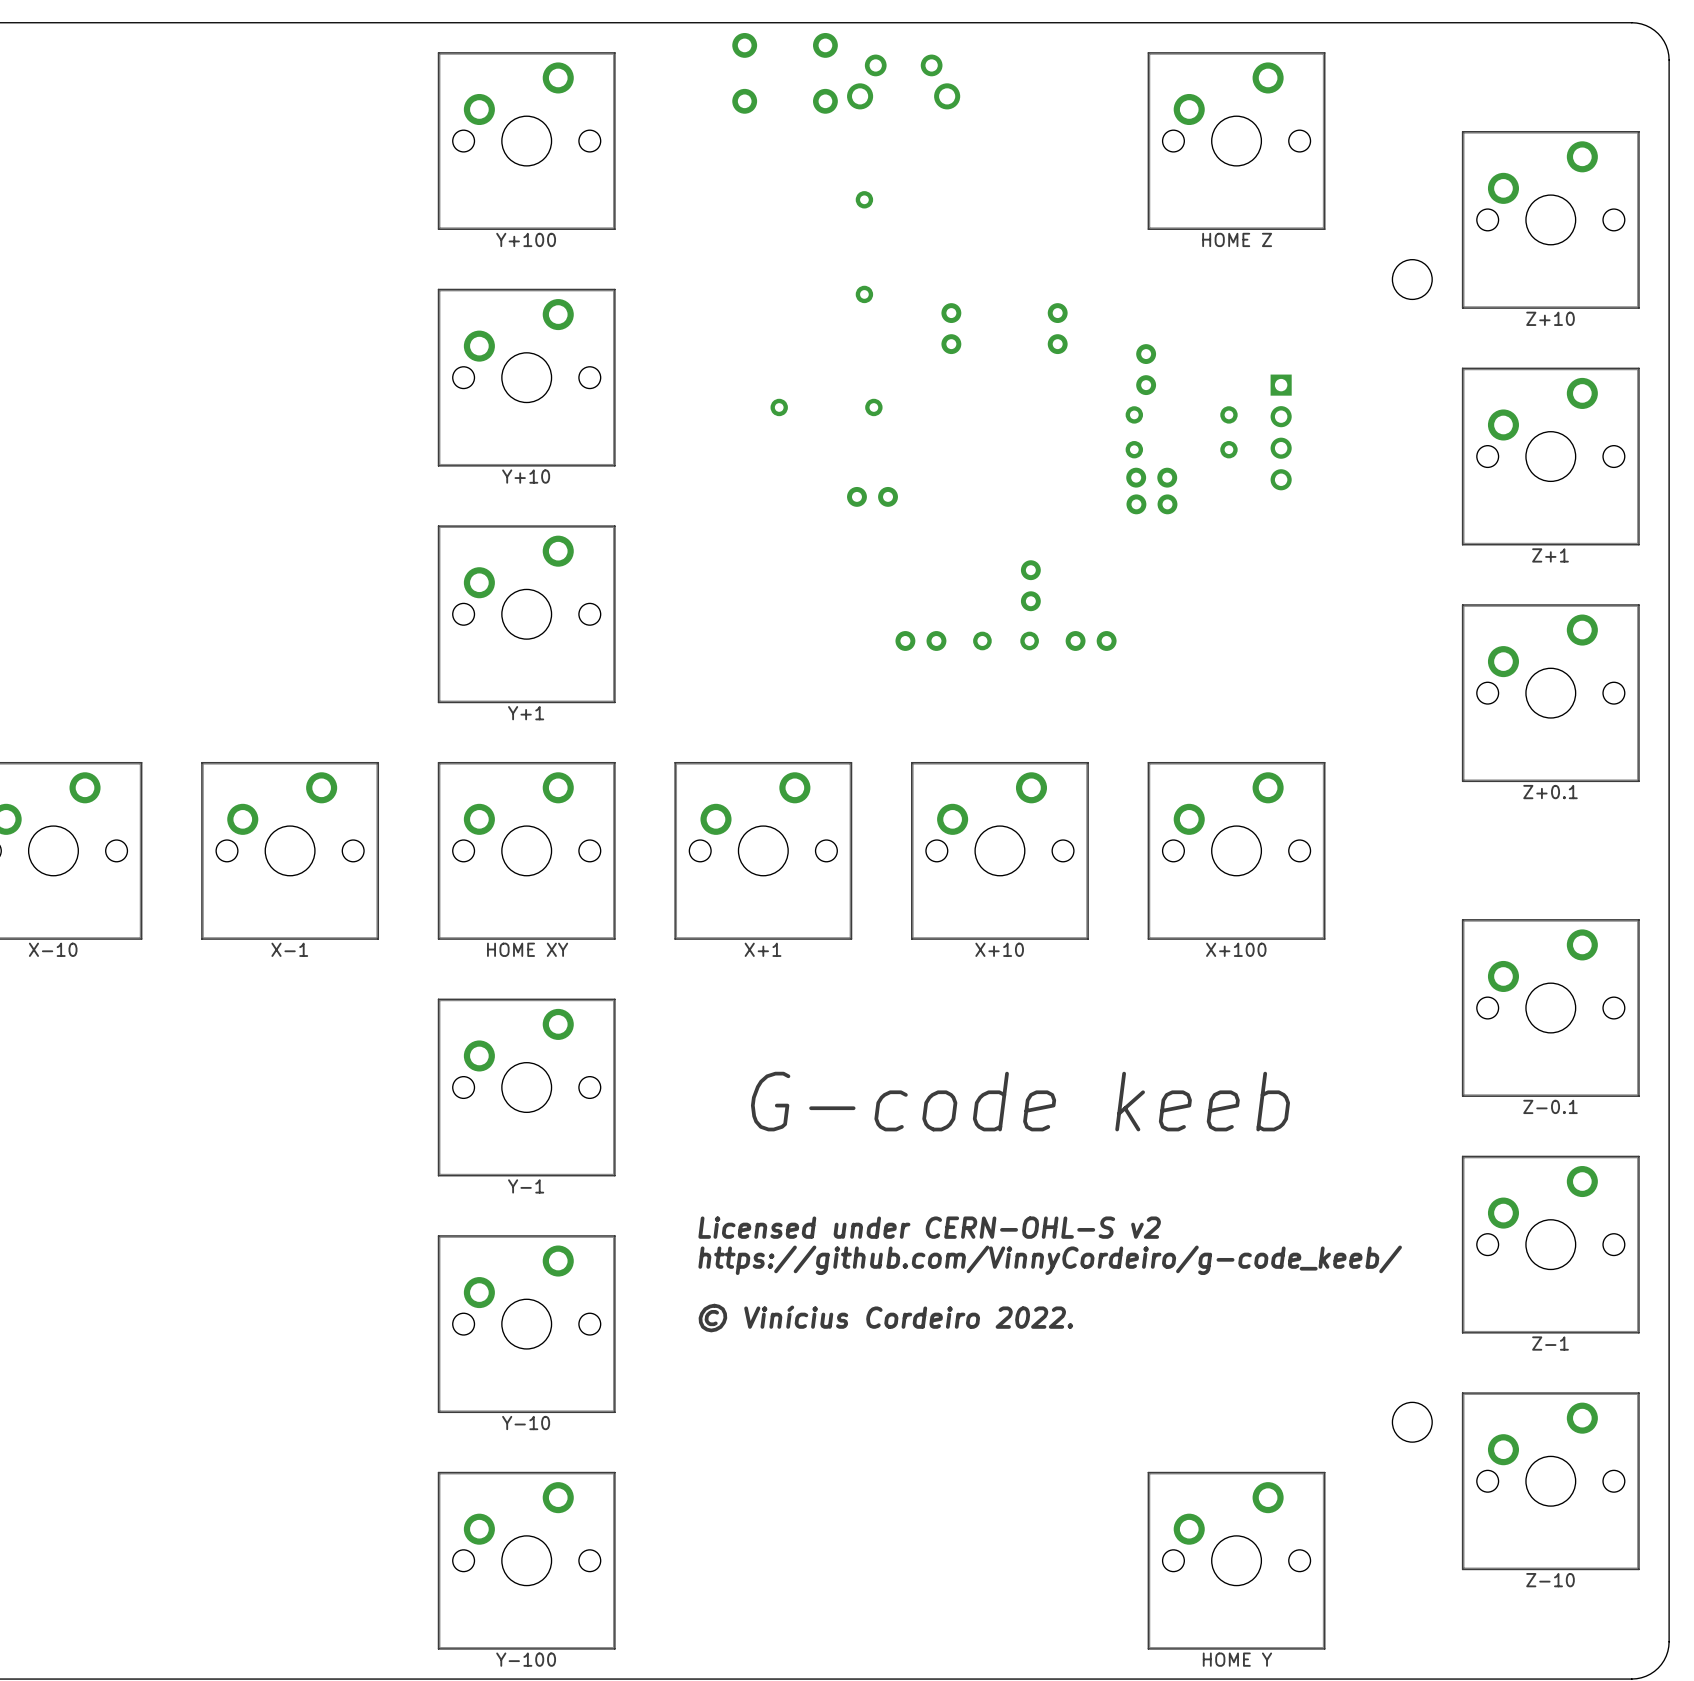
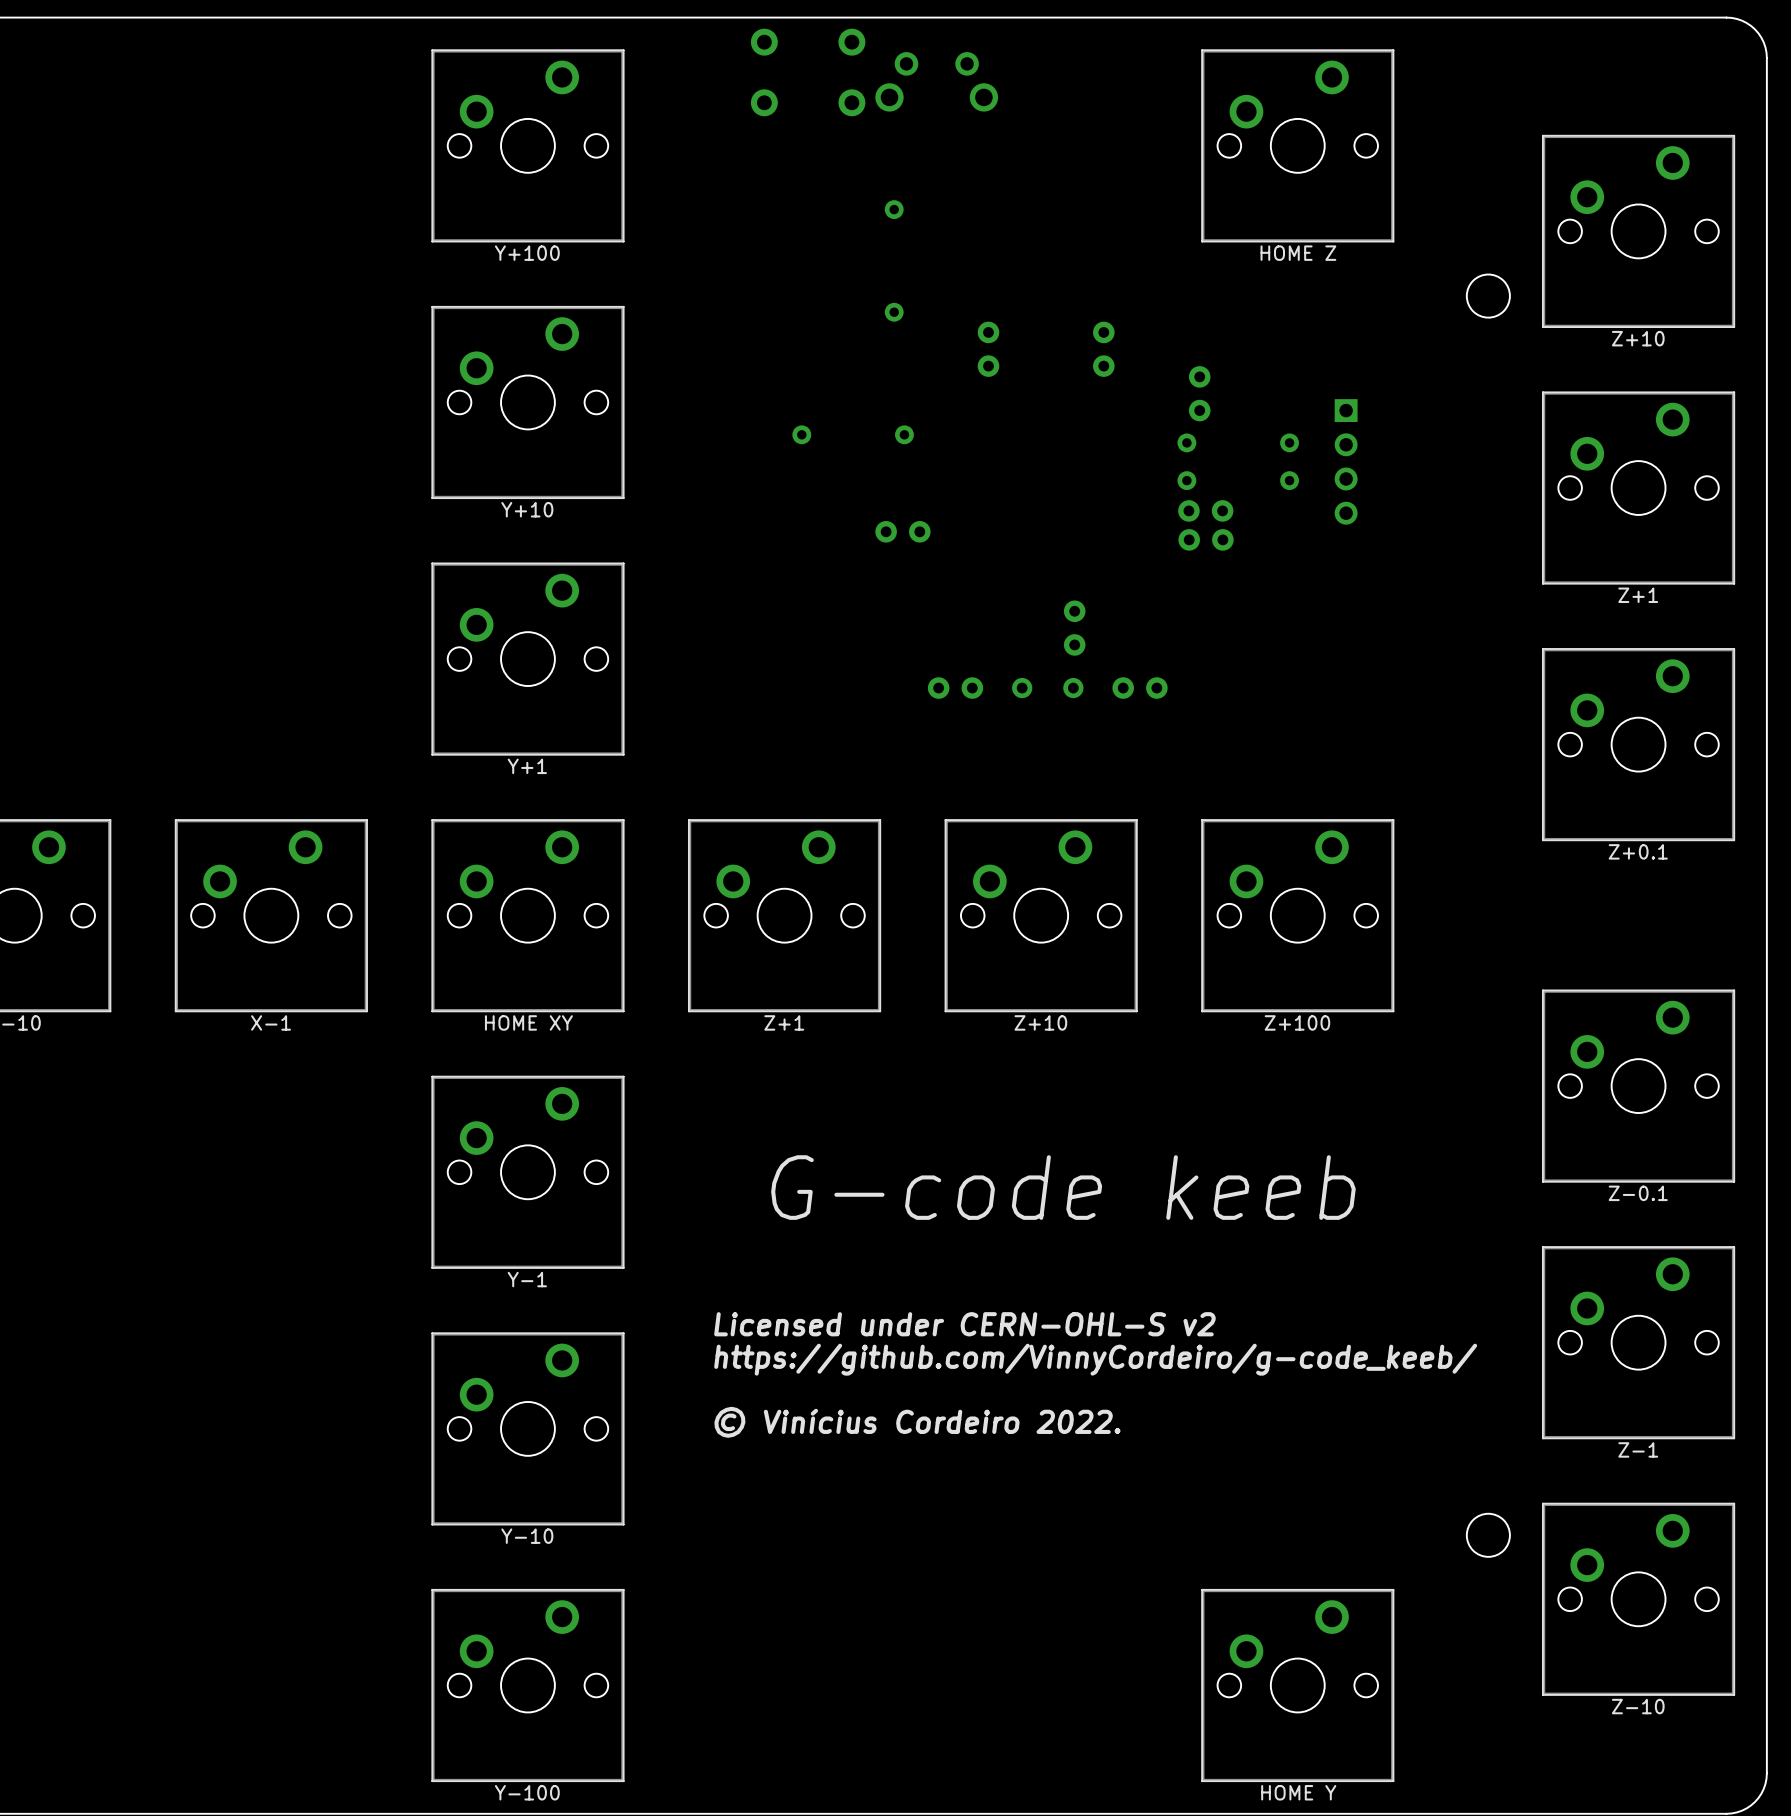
part value: X+1 (763, 949) -> Z+1 (784, 1022)
part value: X+10 (999, 949) -> Z+10 (1040, 1022)
part value: X+100 (1236, 949) -> Z+100 (1297, 1022)

